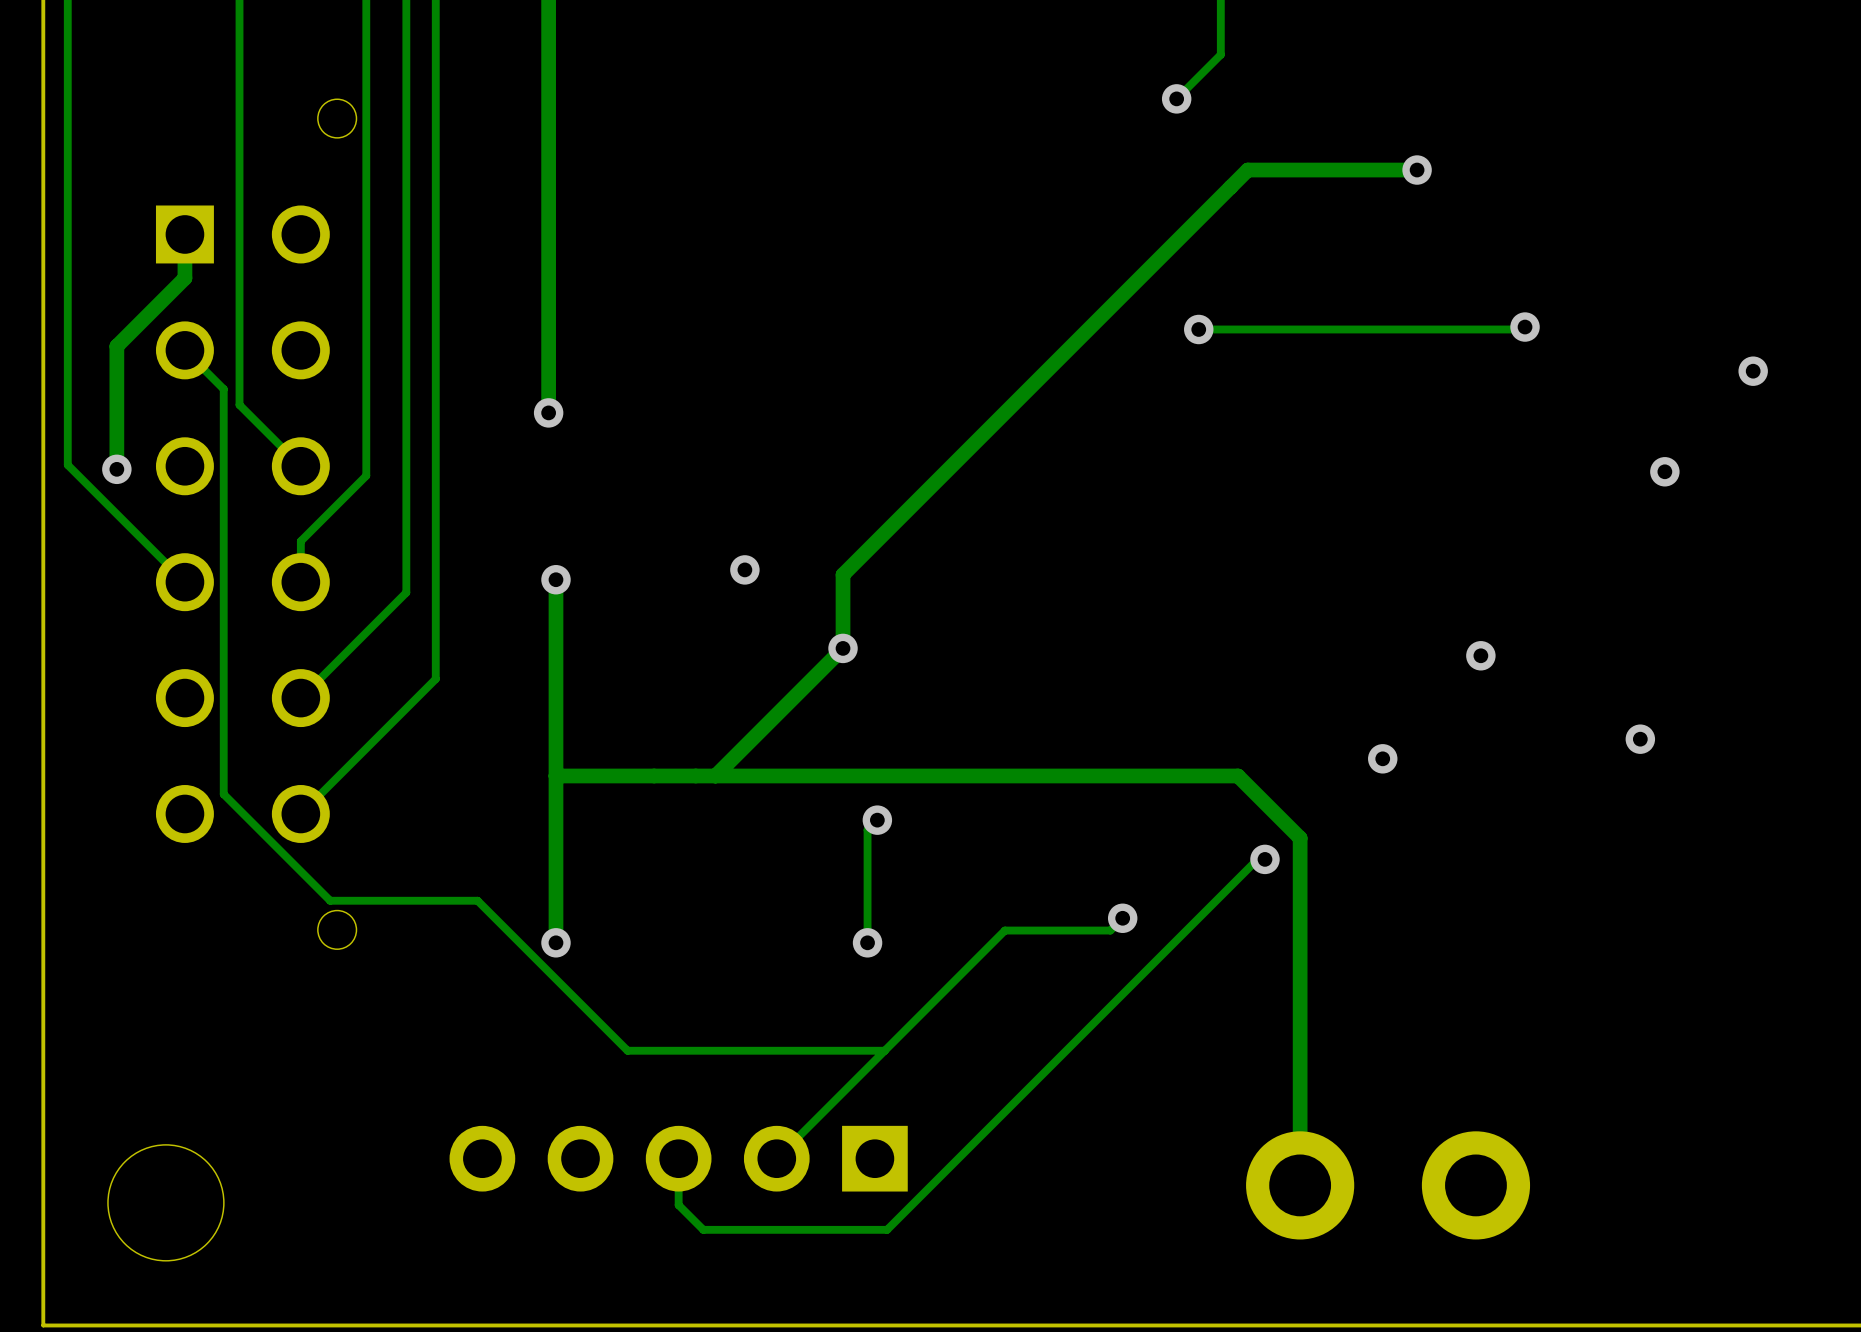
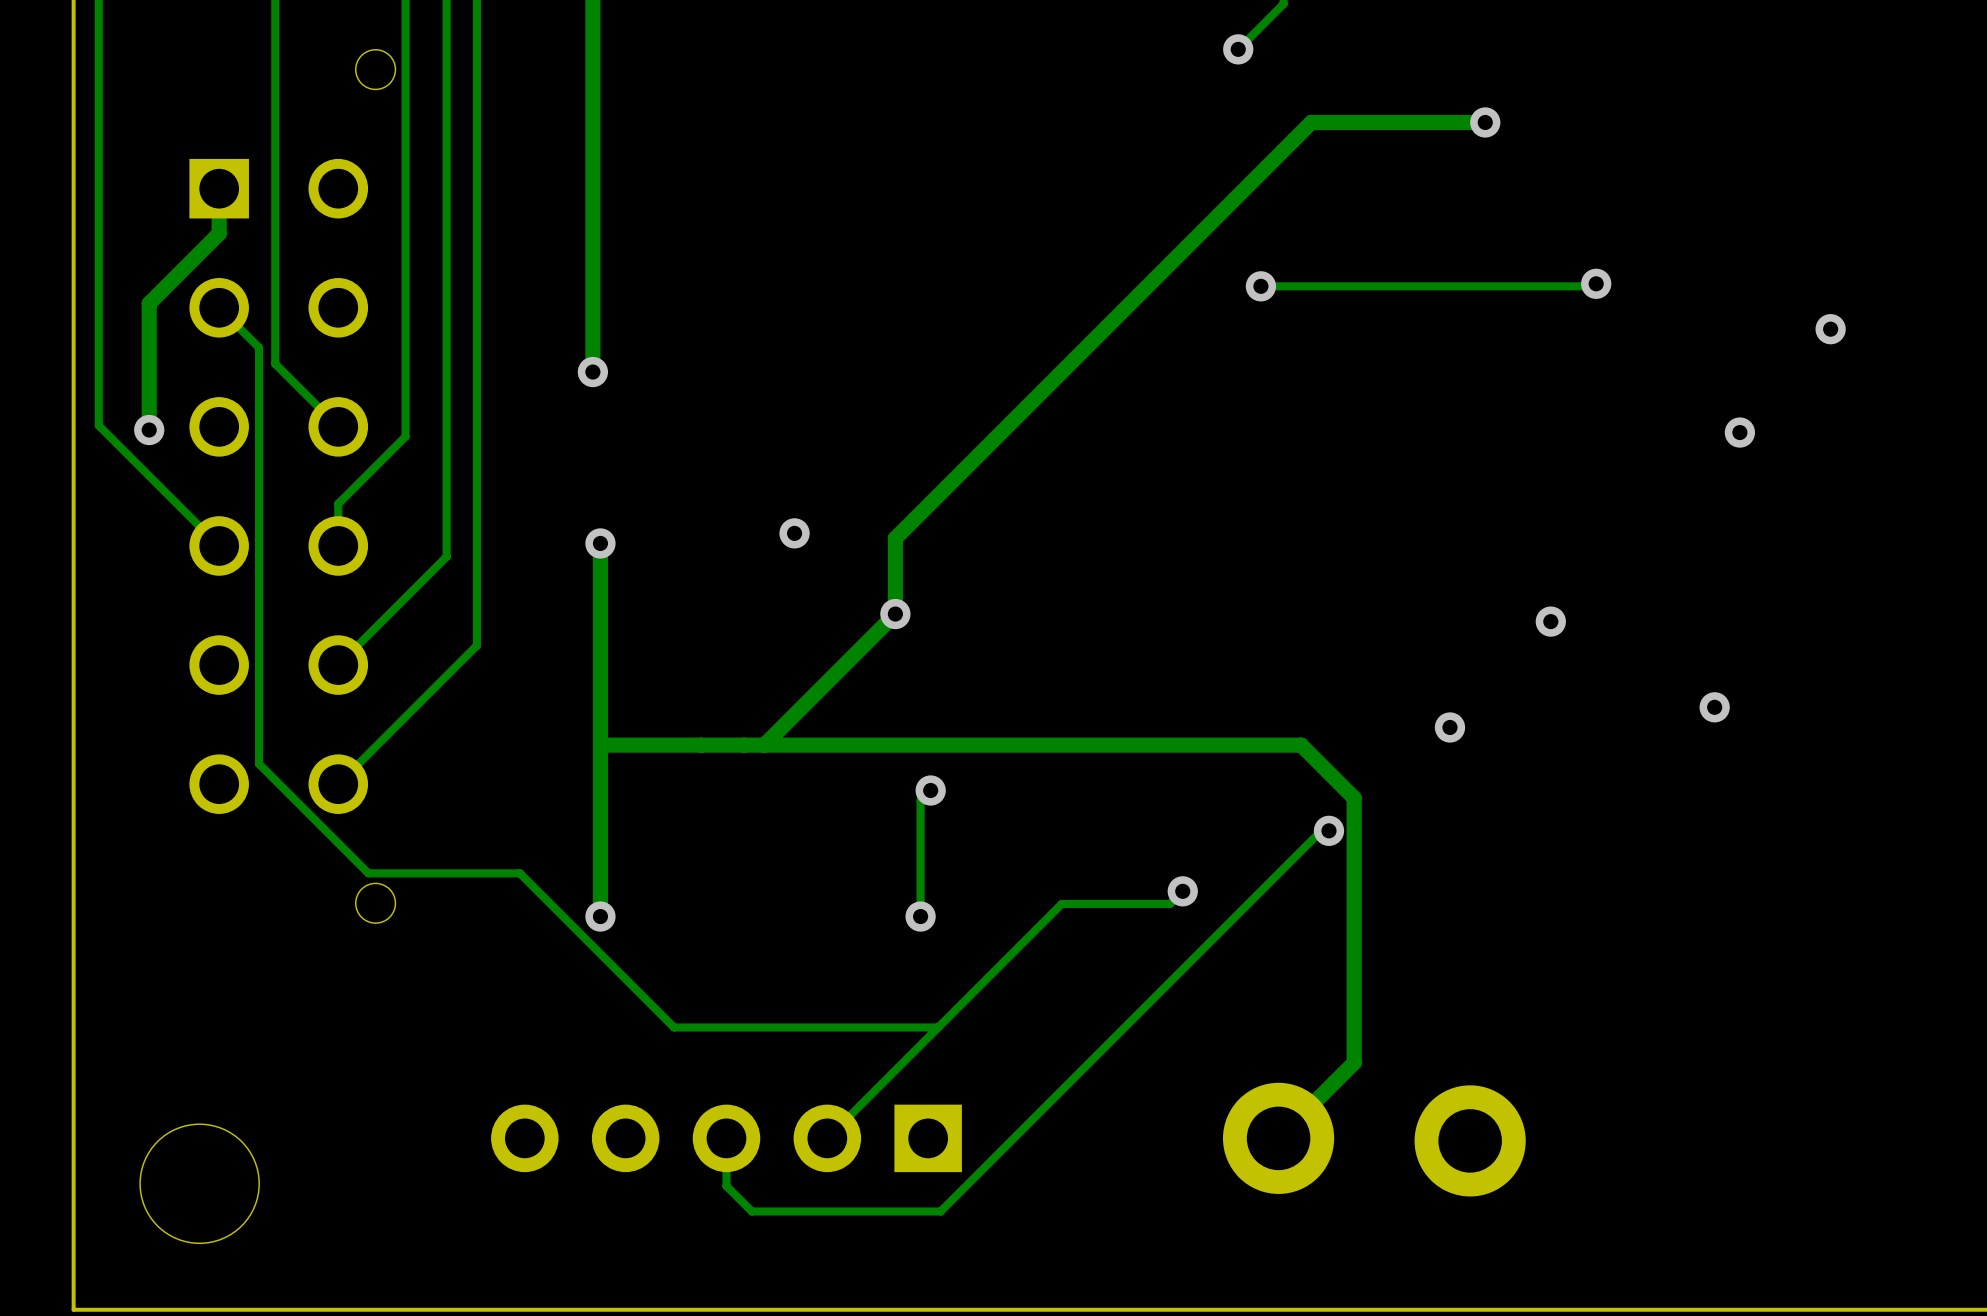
track: (1289, 827) (1300, 838) (1300, 1185) -> (1354, 798) (1354, 1062) (1278, 1138)
part: none -> (1278, 1138)
part: none -> (1470, 1140)
part: (1300, 1185) -> none
part: (1475, 1185) -> none

